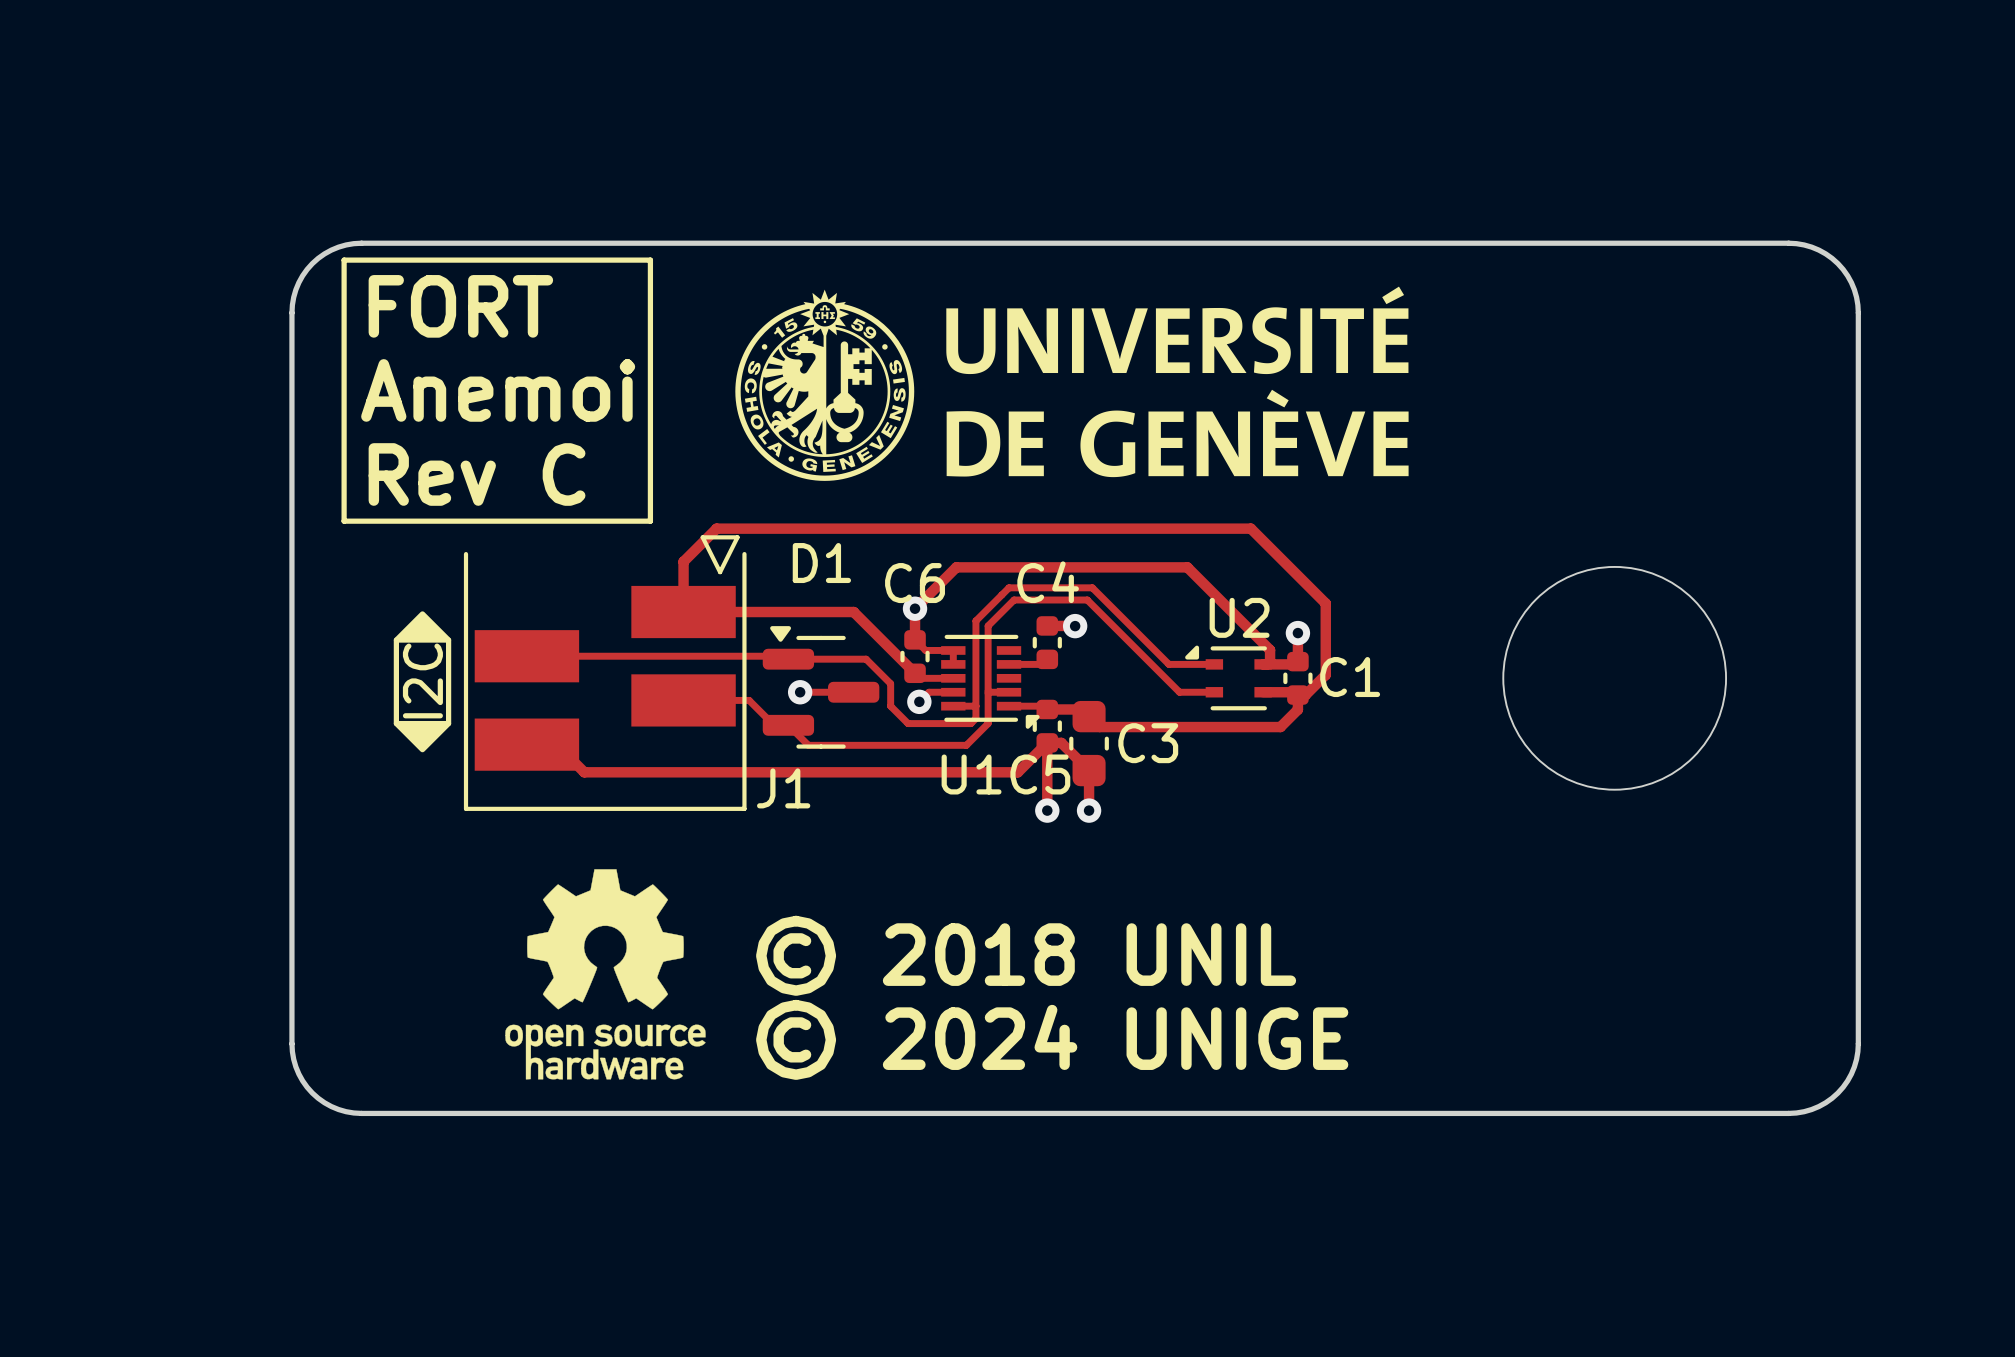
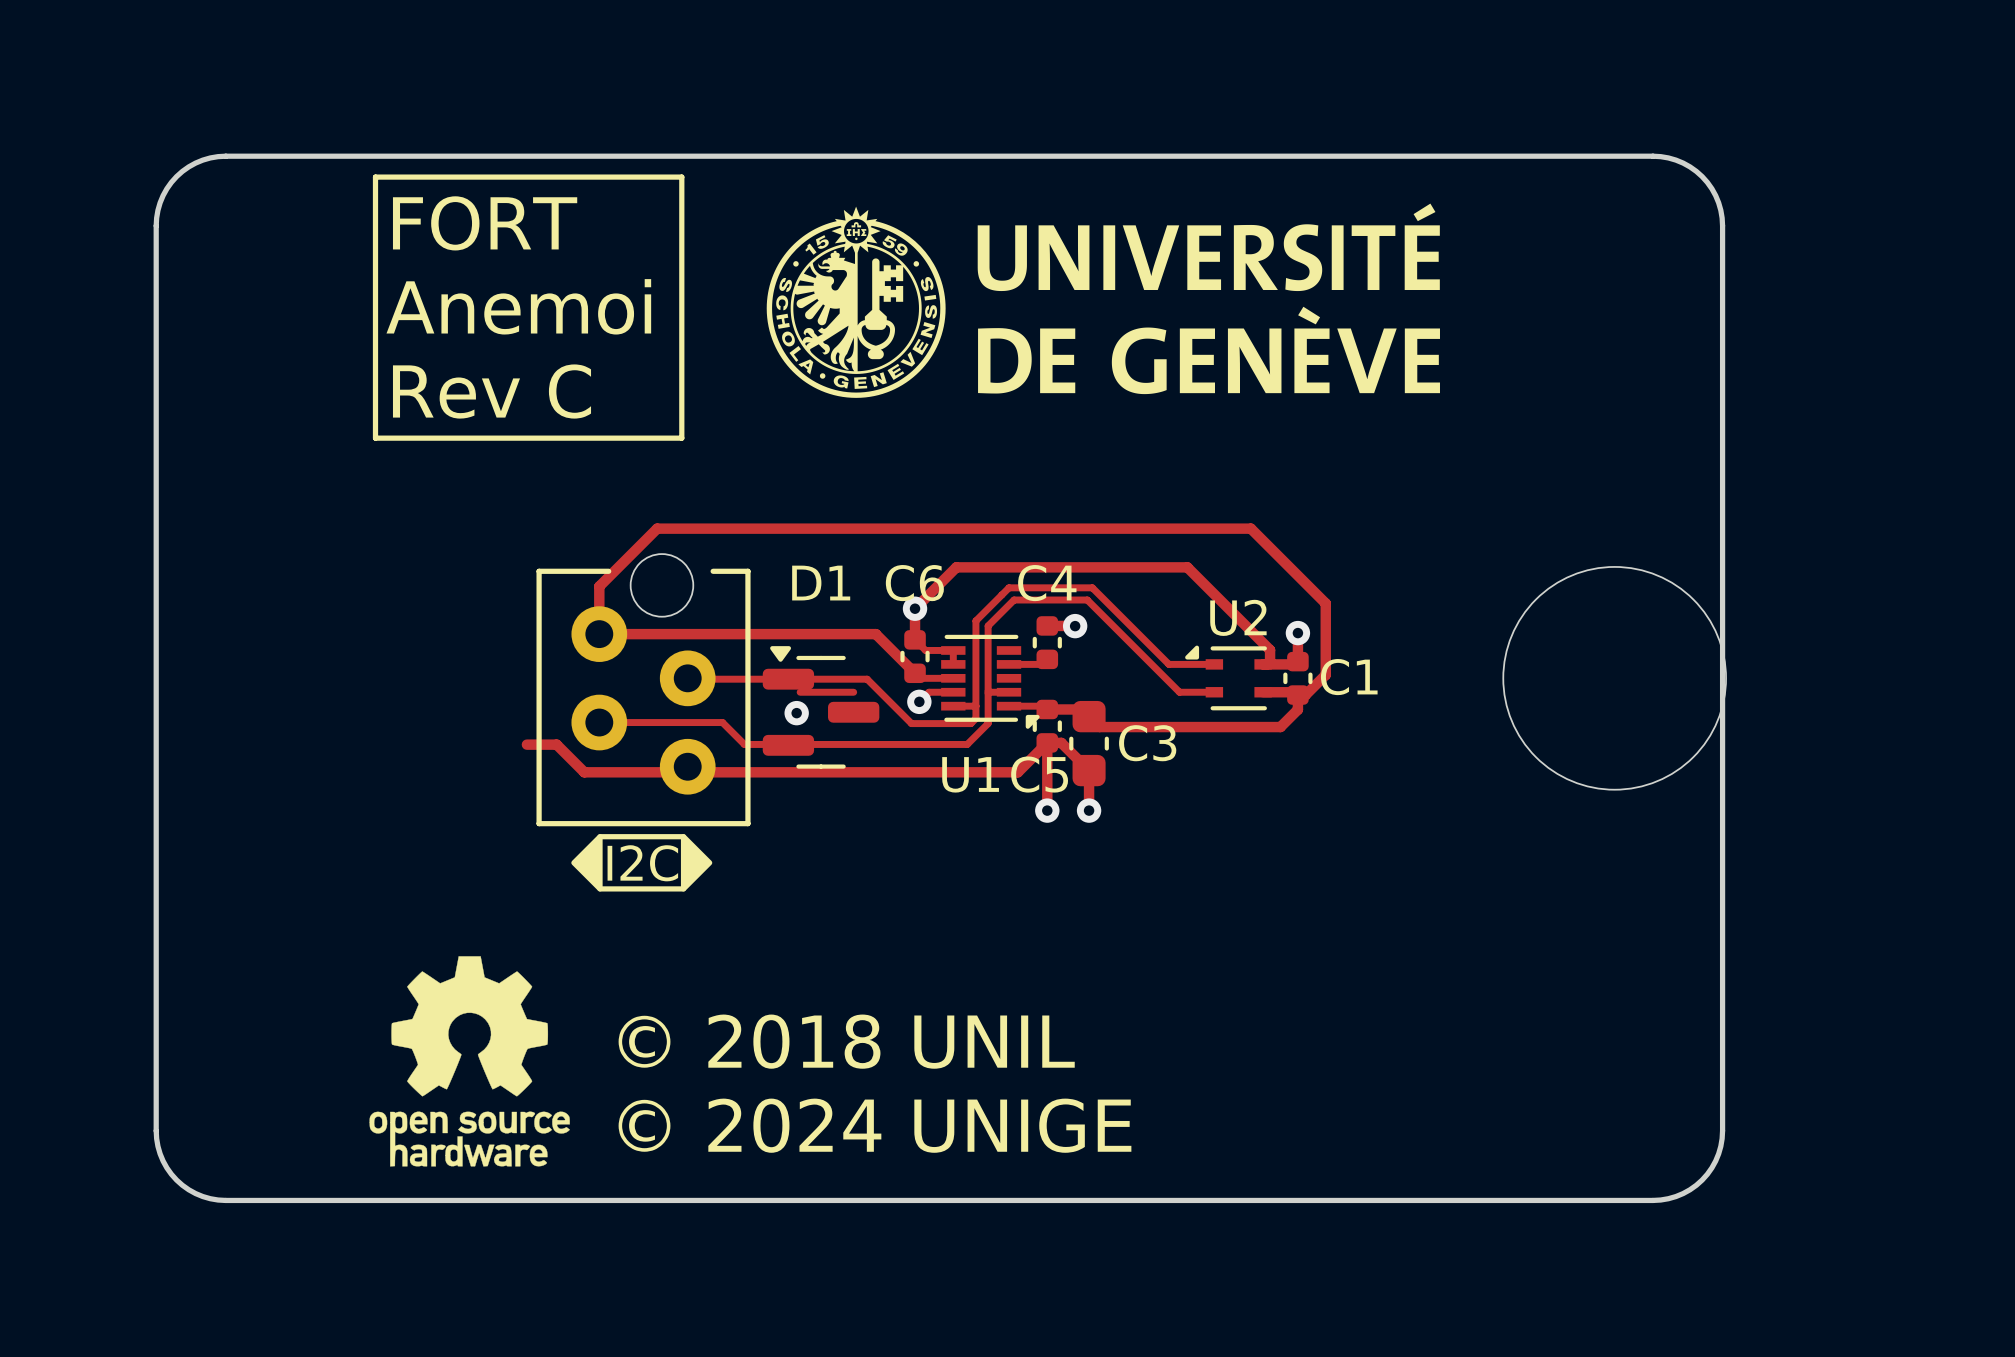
drawing: none -> [1404, 225, 1440, 290]
board edge: (361, 243) (1788, 243) (1811, 247) (1825, 253) (1843, 269) (1851, 282) (1856, 297) (1858, 312) (1858, 1043) (1854, 1066) (1847, 1080) (1832, 1098) (1818, 1106) (1804, 1111) (1788, 1113) (361, 1113) (338, 1109) (324, 1102) (307, 1087) (298, 1074) (293, 1059) (291, 1043) (291, 312) (295, 289) (302, 275) (312, 263) (324, 253) (338, 247) (361, 243) -> (225, 156) (202, 160) (188, 166) (176, 176) (163, 195) (157, 210) (156, 225) (156, 1130) (157, 1146) (163, 1161) (171, 1174) (188, 1189) (202, 1196) (225, 1200) (1652, 1200) (1675, 1196) (1690, 1189) (1702, 1180) (1711, 1167) (1718, 1153) (1722, 1130) (1722, 225) (1720, 210) (1715, 195) (1702, 176) (1690, 166) (1675, 160) (1652, 156) (225, 156)
line: (344, 260) (344, 521) (650, 521) (650, 260) (344, 260) -> (375, 177) (375, 438) (681, 438) (681, 177) (375, 177)
drawing: none -> [793, 261, 799, 267]
drawing: none -> [913, 261, 920, 267]
drawing position: (1393, 295) -> (1424, 212)
text position: FORT (460, 306) -> FORT (485, 223)
drawing position: (824, 307) -> (856, 224)
drawing position: (817, 315) -> (849, 232)
drawing position: (824, 315) -> (856, 232)
drawing position: (832, 315) -> (863, 232)
drawing position: (824, 321) -> (856, 238)
drawing position: (858, 324) -> (889, 241)
drawing position: (790, 325) -> (822, 241)
drawing: none -> [1040, 328, 1076, 394]
drawing: none -> [1179, 328, 1216, 394]
drawing: none -> [1294, 328, 1330, 394]
drawing position: (779, 332) -> (810, 249)
drawing position: (869, 332) -> (901, 249)
drawing position: (1032, 340) -> (1064, 257)
drawing position: (1077, 340) -> (1109, 257)
drawing position: (1119, 340) -> (1150, 257)
drawing position: (1172, 340) -> (1204, 257)
drawing position: (1224, 340) -> (1255, 257)
drawing position: (1271, 340) -> (1303, 257)
drawing position: (1306, 340) -> (1337, 257)
drawing position: (1342, 340) -> (1373, 257)
drawing position: (1390, 340) -> (1422, 360)
drawing position: (970, 341) -> (1002, 258)
drawing: [761, 344, 768, 350] -> none
drawing: [882, 344, 888, 350] -> none
drawing position: (754, 367) -> (785, 284)
drawing position: (895, 367) -> (927, 284)
drawing: none -> [819, 373, 826, 379]
drawing position: (898, 380) -> (930, 297)
drawing position: (750, 385) -> (782, 302)
drawing position: (824, 385) -> (856, 302)
text position: Anemoi (498, 390) -> Anemoi (518, 306)
drawing position: (899, 394) -> (931, 311)
drawing position: (1277, 398) -> (1309, 315)
drawing position: (751, 404) -> (783, 321)
drawing: [1008, 411, 1044, 477] -> none
drawing: [1148, 411, 1184, 477] -> none
drawing: [1263, 411, 1299, 477] -> none
drawing: [1373, 411, 1409, 477] -> none
drawing position: (896, 413) -> (927, 330)
drawing position: (757, 422) -> (788, 338)
drawing position: (889, 429) -> (920, 346)
drawing position: (763, 436) -> (795, 353)
drawing position: (876, 442) -> (907, 359)
drawing position: (973, 443) -> (1004, 360)
drawing position: (1107, 443) -> (1139, 360)
drawing position: (1223, 443) -> (1254, 360)
drawing position: (1335, 443) -> (1366, 360)
drawing position: (774, 449) -> (805, 366)
drawing position: (864, 454) -> (895, 371)
drawing: [788, 456, 794, 462] -> none
drawing position: (847, 462) -> (878, 379)
drawing position: (809, 464) -> (841, 381)
drawing position: (829, 465) -> (860, 382)
text position: Rev C (477, 474) -> Rev C (492, 391)
track: (716, 528) (683, 561) (683, 612) (853, 612) (875, 634) -> (716, 528) (657, 528) (599, 586) (599, 634) (875, 634)
drawing: [393, 611, 452, 643] -> none
line: (396, 640) (396, 723) -> none
line: (448, 640) (448, 723) -> none
track: (526, 656) (774, 656) (777, 659) (866, 659) (890, 683) (890, 706) (908, 723) (911, 723) -> (688, 679) (867, 679) (911, 723)
J1: (605, 673) -> none
text rotation: 0° (422, 680) -> 90° clockwise (642, 863)
text position: I2C (422, 680) -> I2C (642, 863)
D1 position: (821, 687) -> (821, 707)
part: none -> (643, 690)
via position: (800, 692) -> (796, 713)
track: (683, 700) (749, 700) (774, 725) (788, 725) (808, 745) (967, 744) -> (599, 722) (722, 722) (744, 744) (967, 744)
drawing: [393, 720, 452, 753] -> none
drawing: none -> [571, 834, 603, 892]
drawing: none -> [680, 834, 713, 892]
line: none -> (600, 836) (683, 836)
line: none -> (600, 888) (683, 888)
text position: © 2018 UNIL (1026, 955) -> © 2018 UNIL (846, 1041)
drawing position: (605, 974) -> (469, 1061)
text position: © 2024 UNIGE (1052, 1039) -> © 2024 UNIGE (874, 1125)

